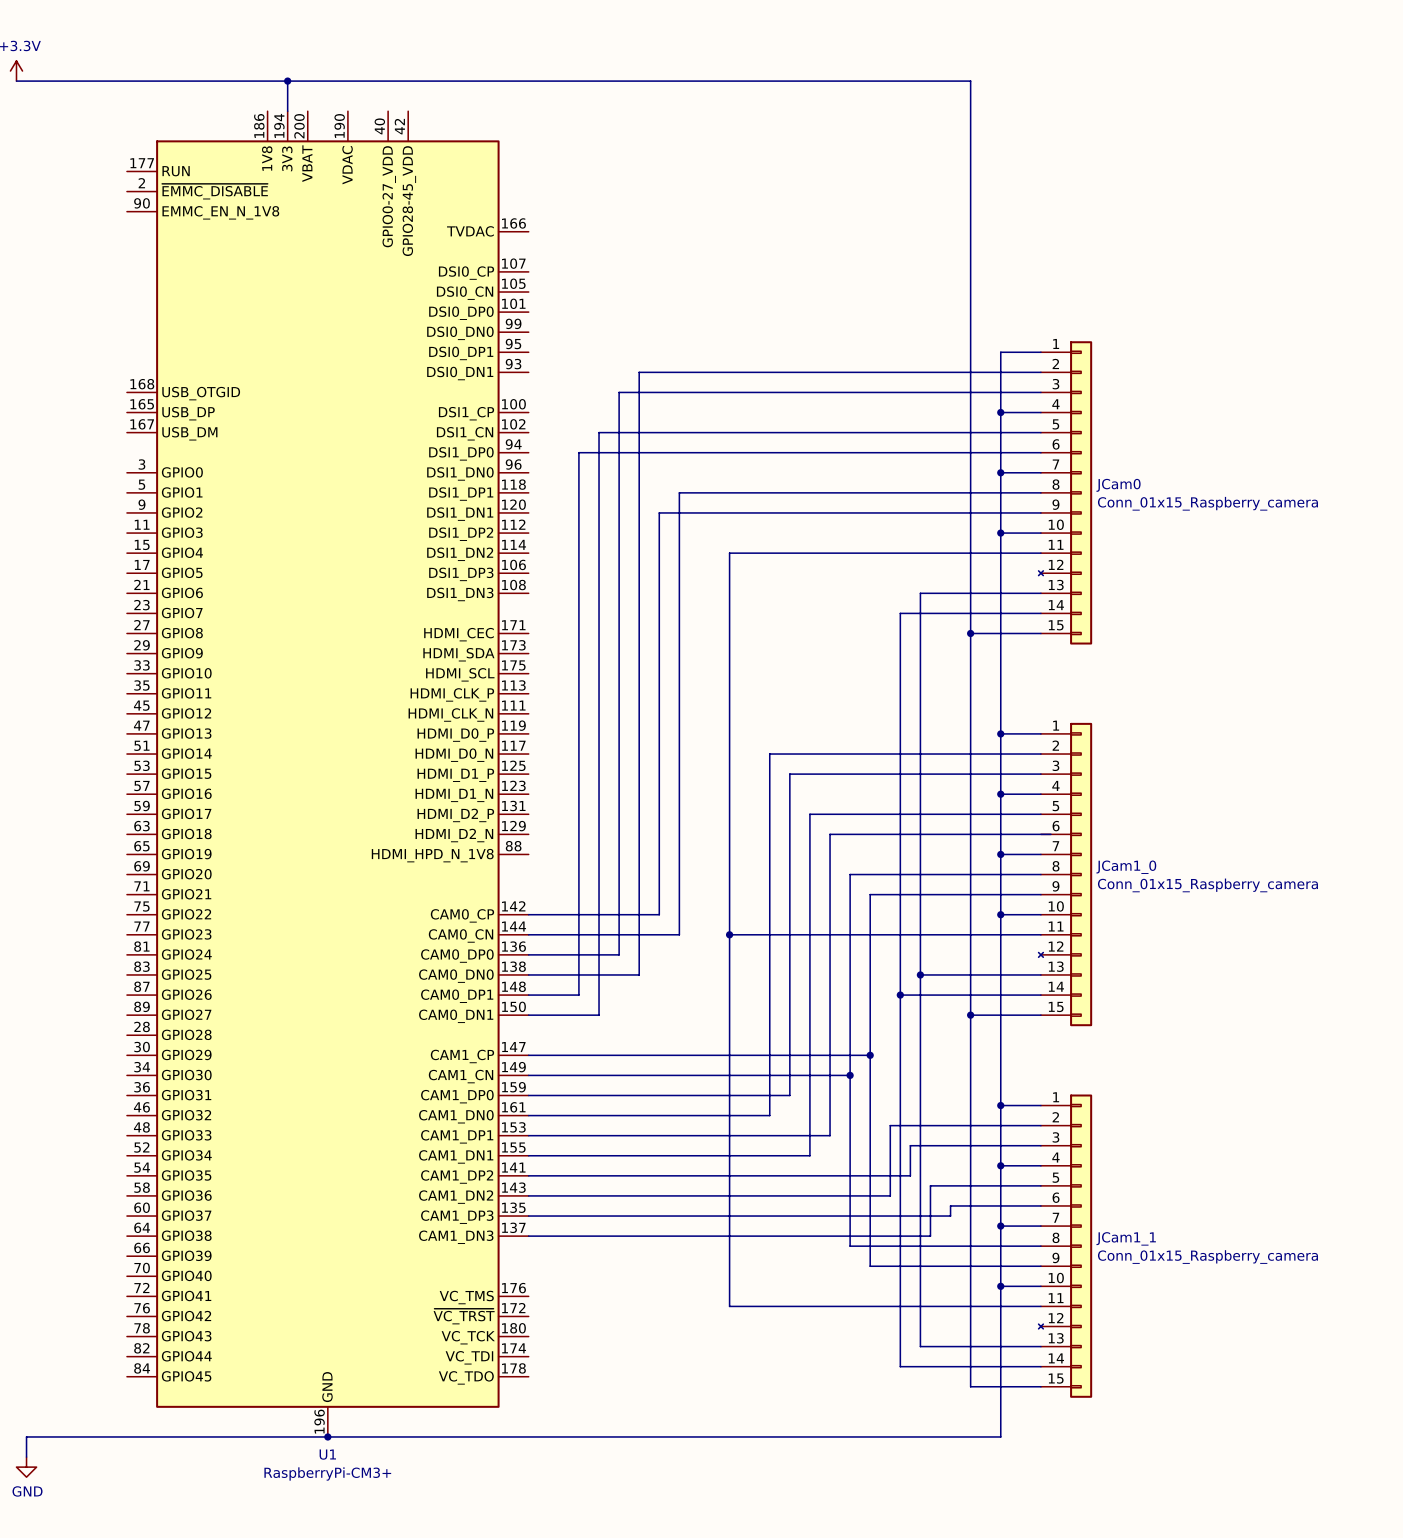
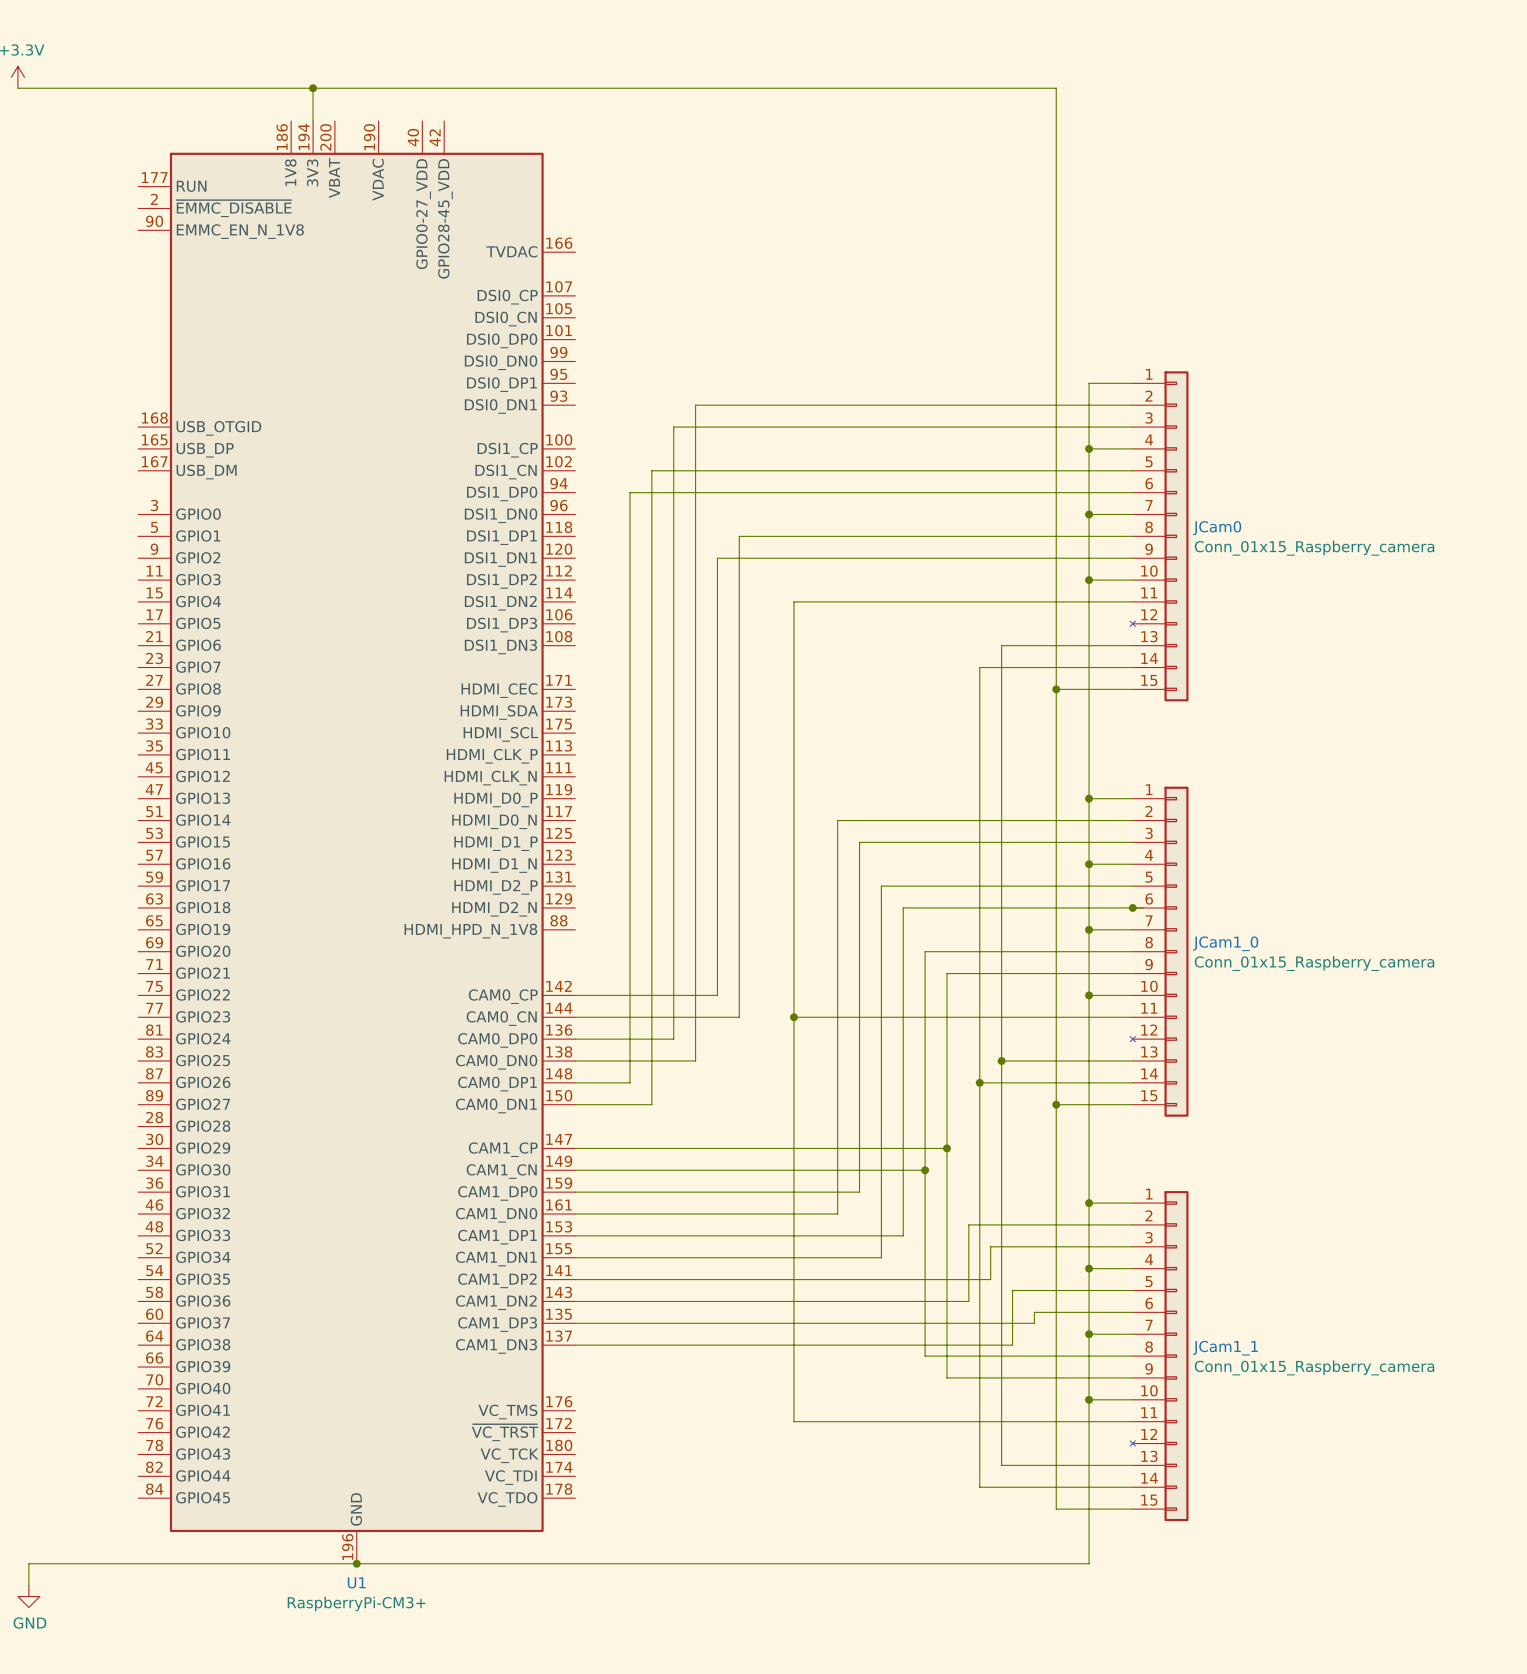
junction: none -> (1132, 907)

